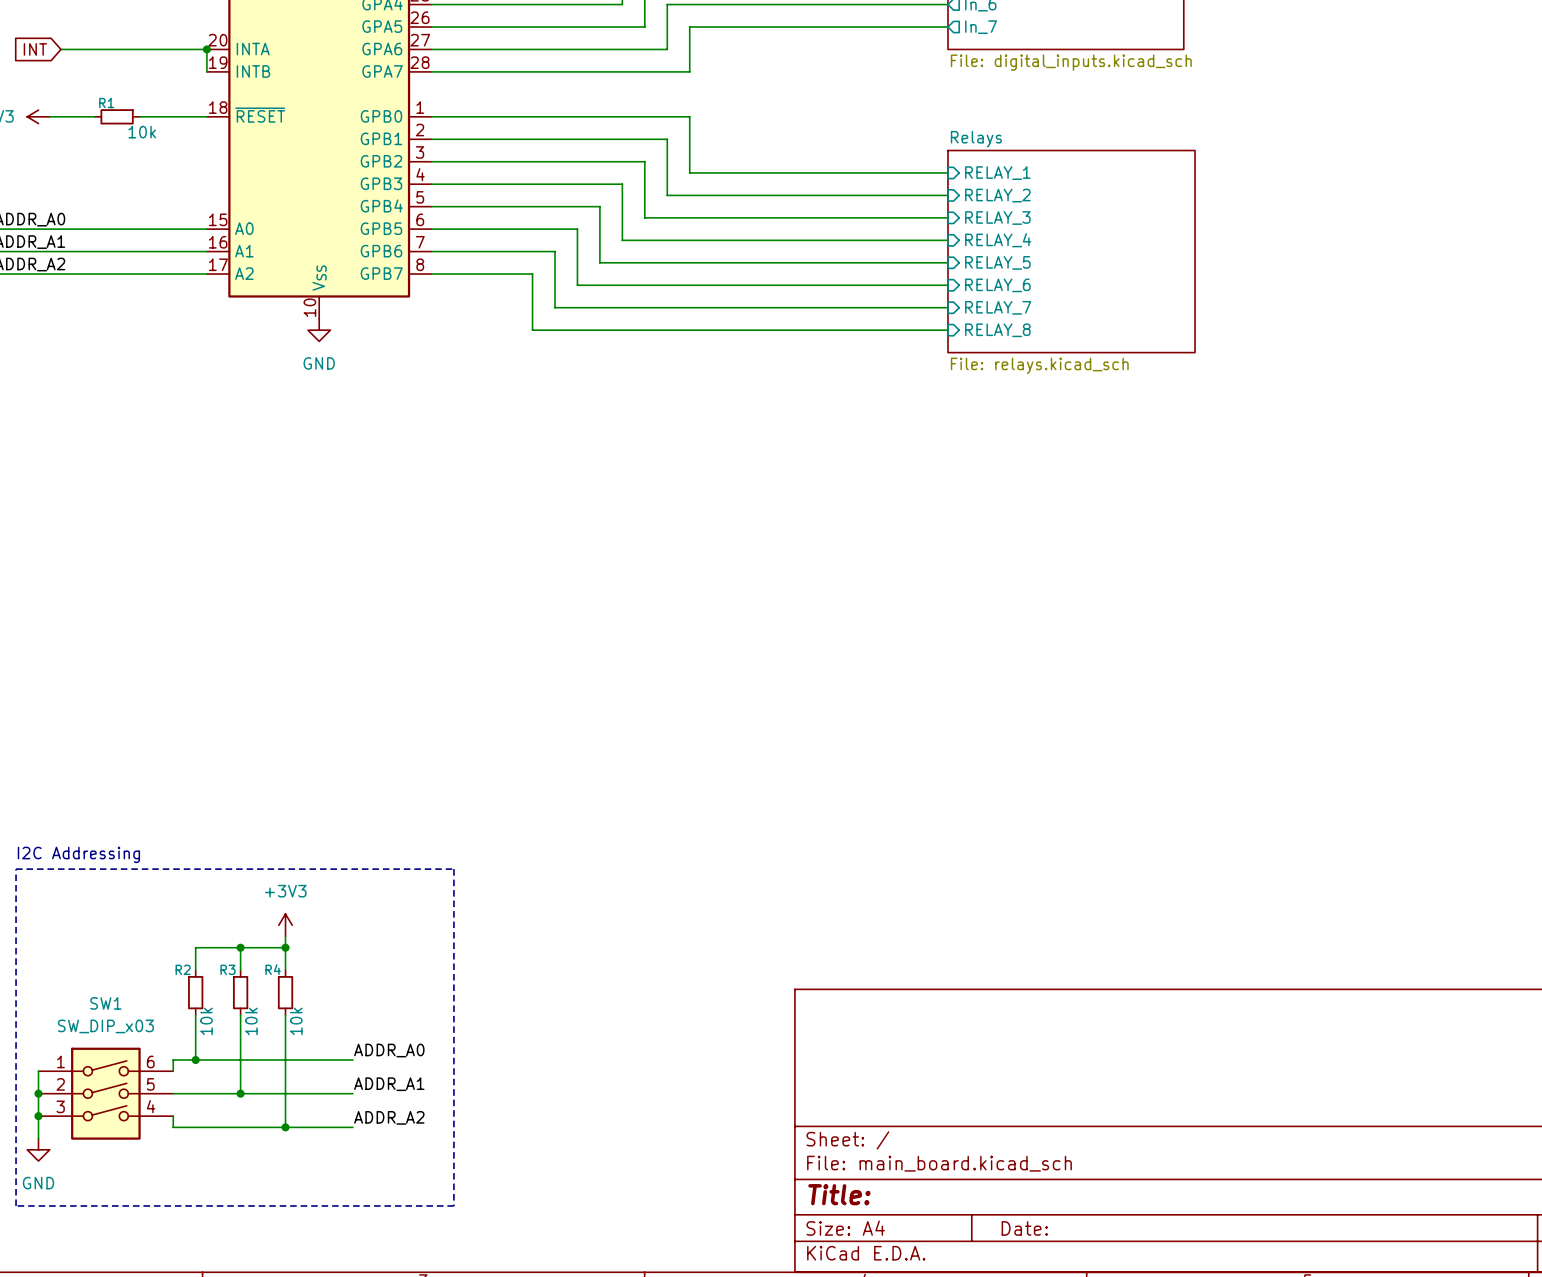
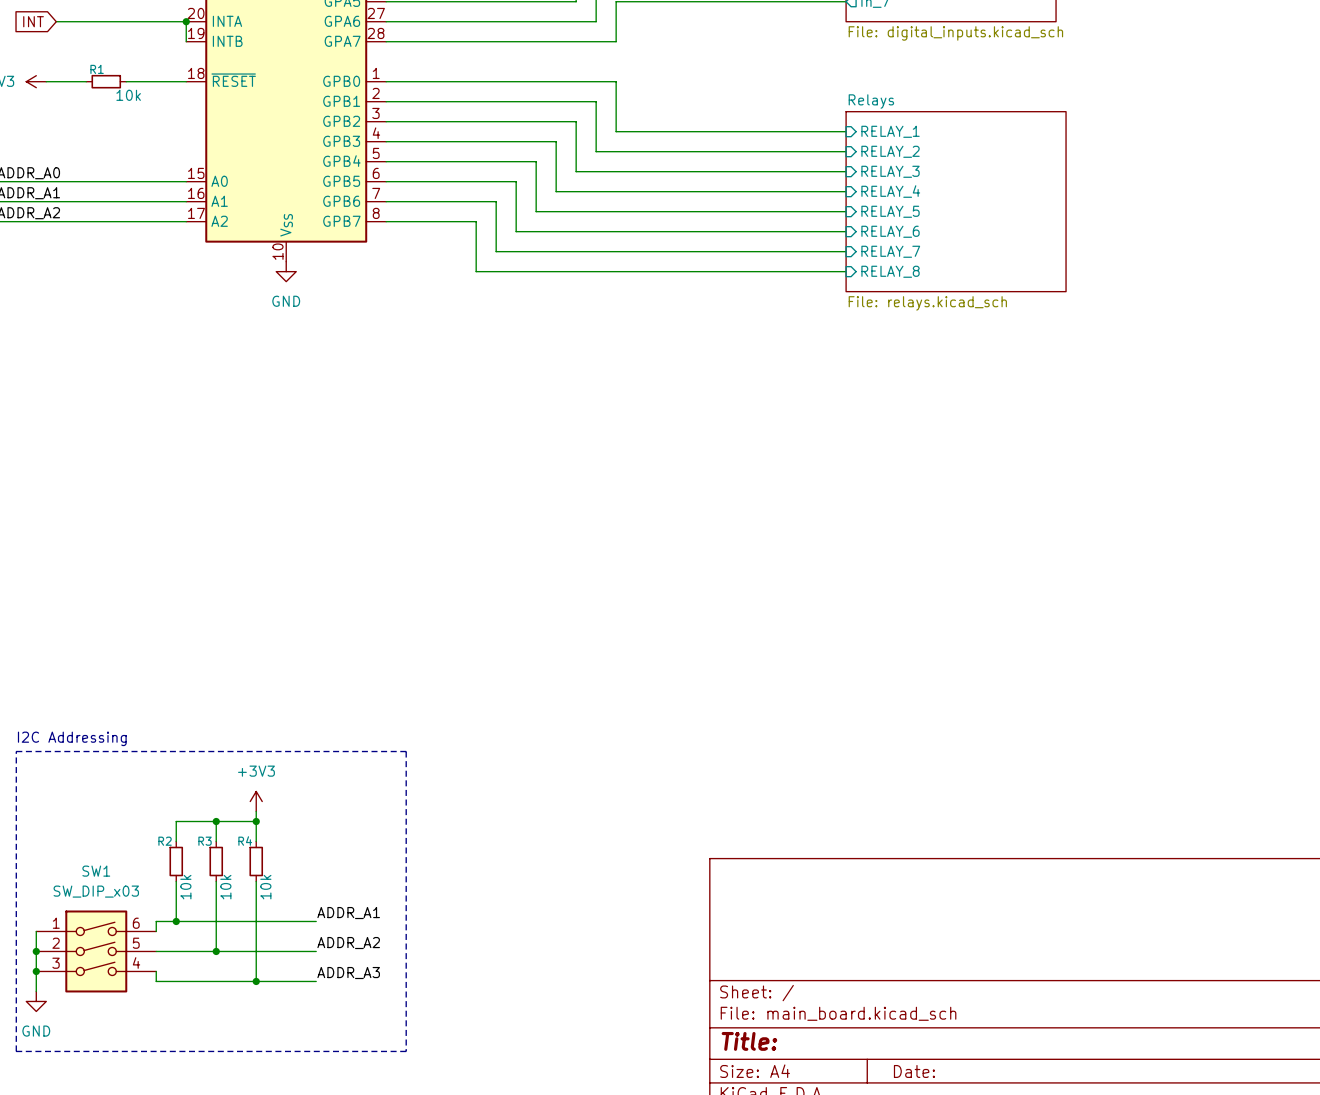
label: ADDR_A0 (389, 1050) -> ADDR_A1 (348, 913)
label: ADDR_A1 (389, 1084) -> ADDR_A2 (348, 943)
label: ADDR_A2 (389, 1117) -> ADDR_A3 (348, 973)

